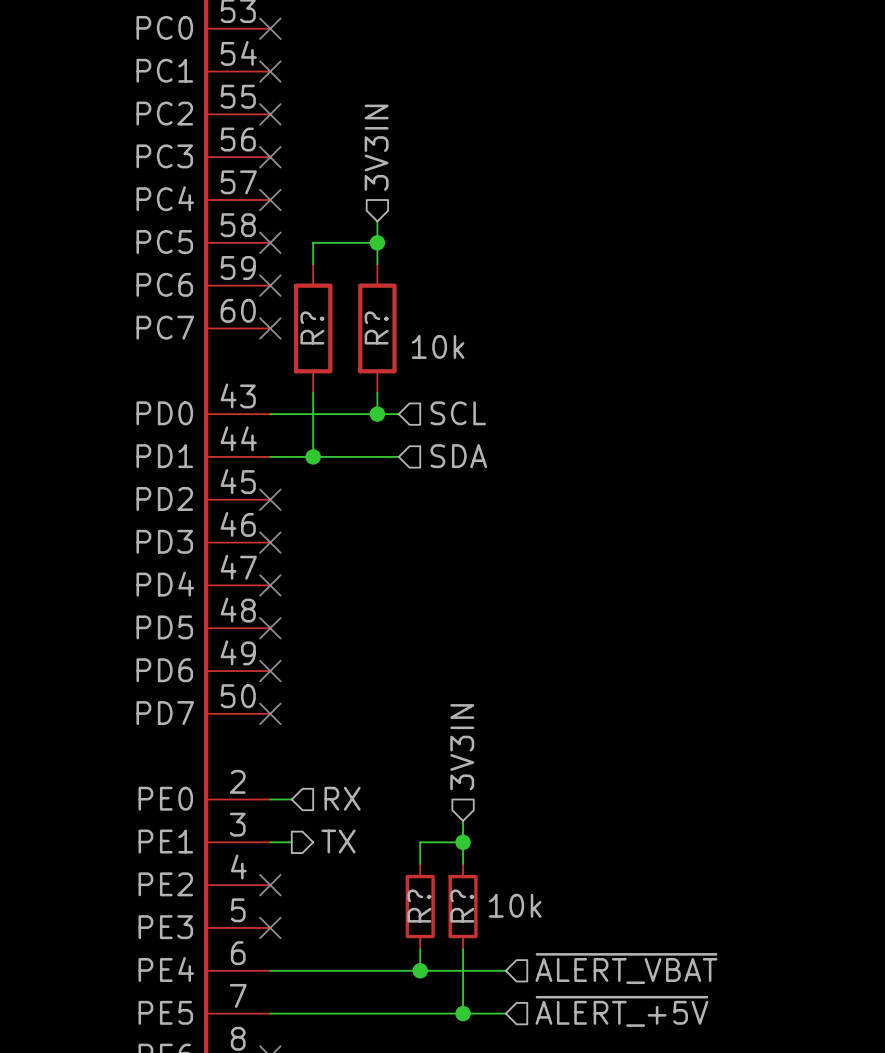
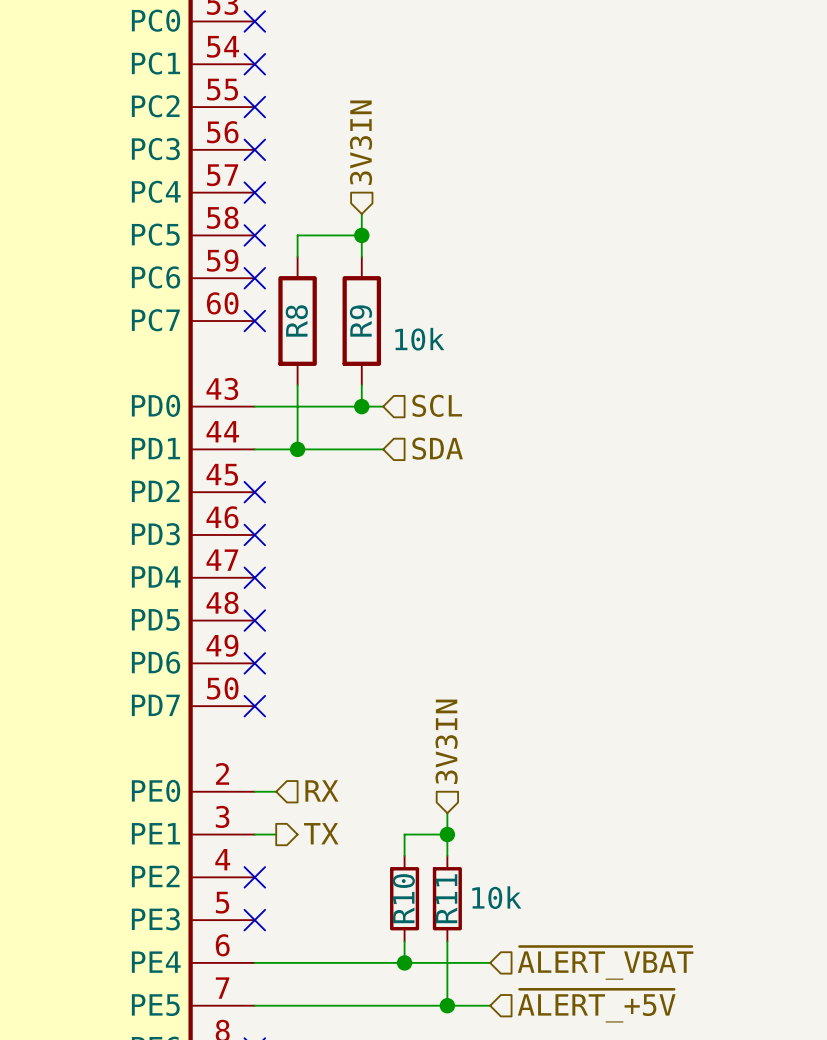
R? name: R? (312, 327) -> R8 (296, 320)
R? name: R? (376, 327) -> R9 (361, 320)
R? name: R? (419, 906) -> R10 (403, 898)
R? name: R? (462, 906) -> R11 (446, 898)

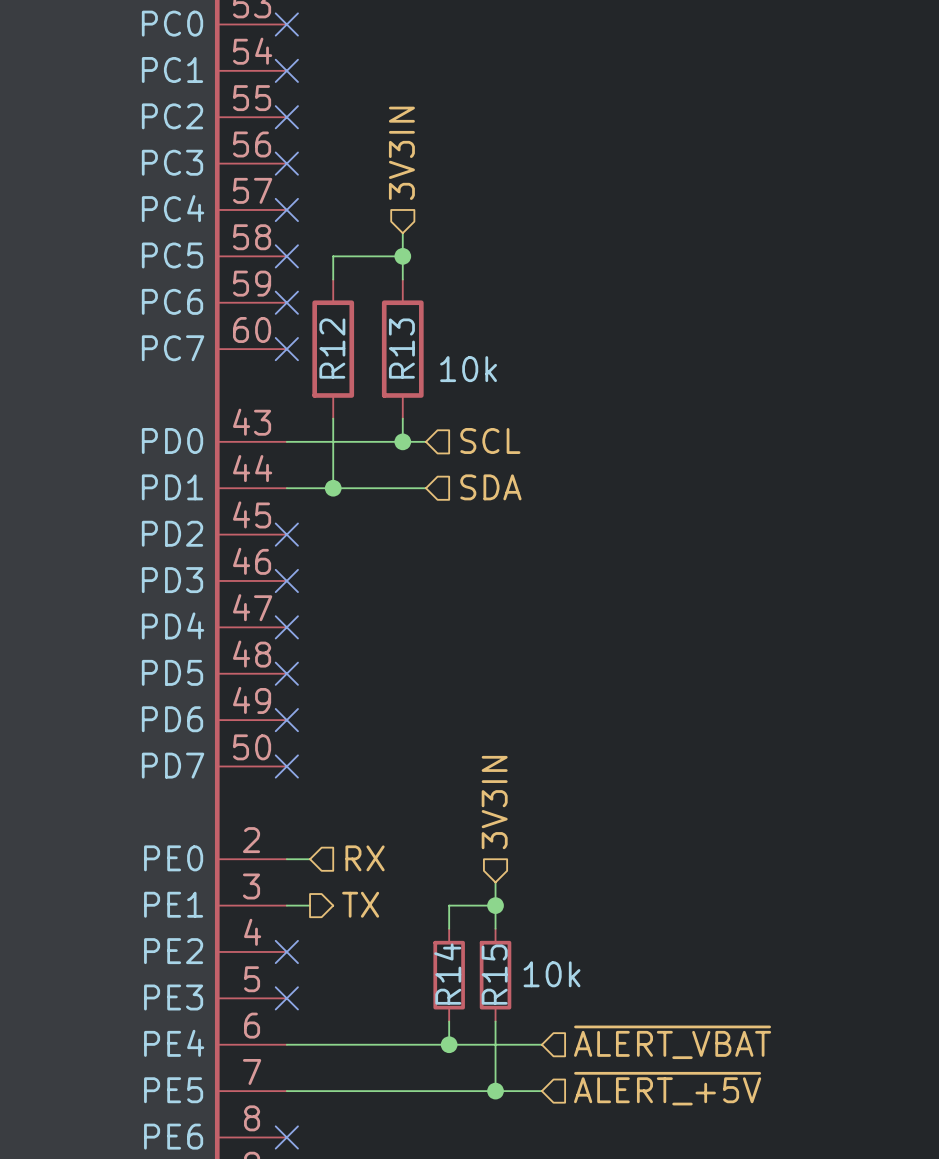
R8 name: R8 (296, 320) -> R12 (332, 348)
R9 name: R9 (361, 320) -> R13 (401, 348)
R10 name: R10 (403, 898) -> R14 (447, 974)
R11 name: R11 (446, 898) -> R15 (494, 974)

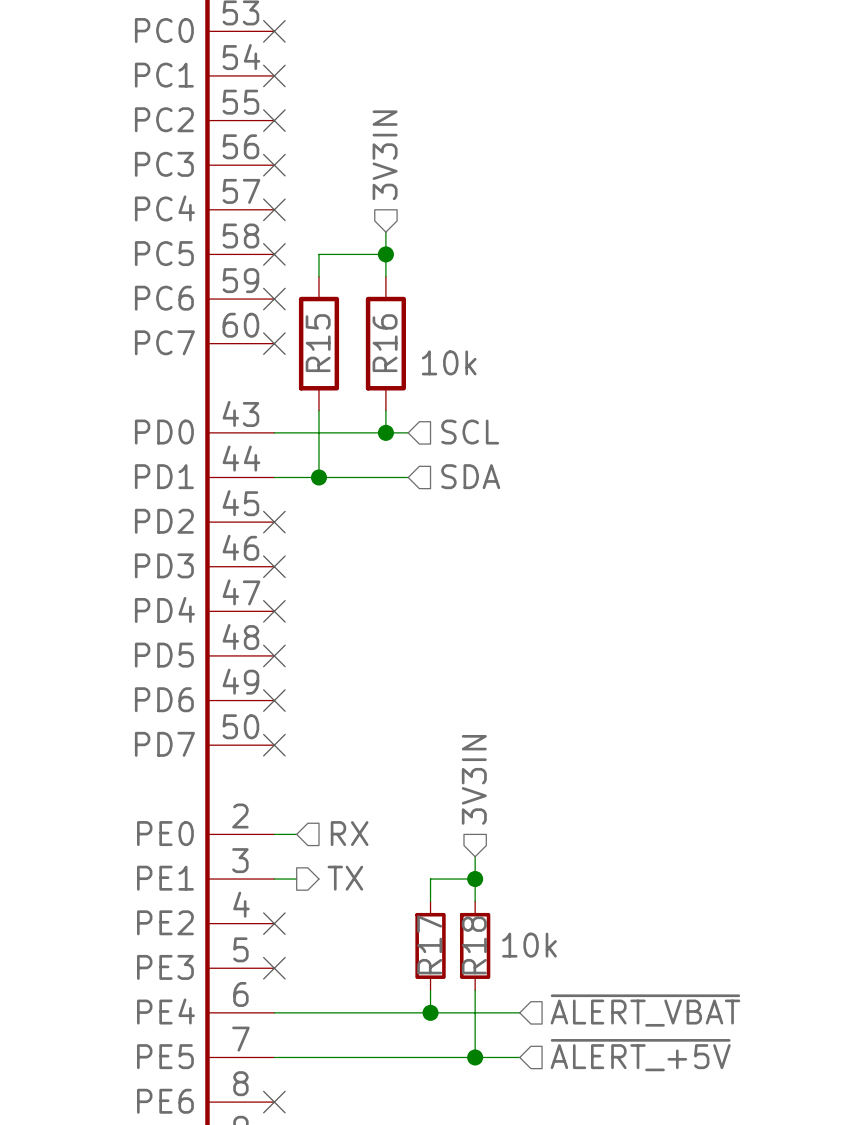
R12 name: R12 (332, 348) -> R15 (318, 343)
R13 name: R13 (401, 348) -> R16 (385, 343)
R14 name: R14 (447, 974) -> R17 (429, 944)
R15 name: R15 (494, 974) -> R18 (474, 945)

